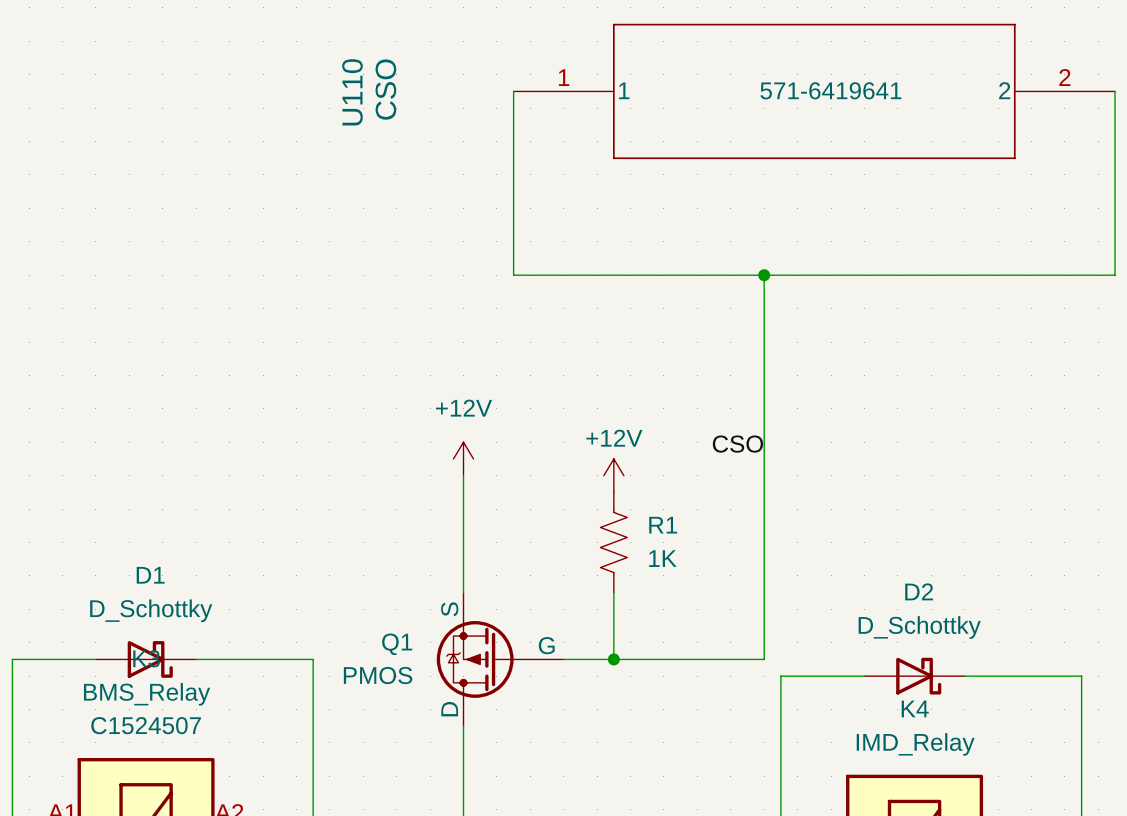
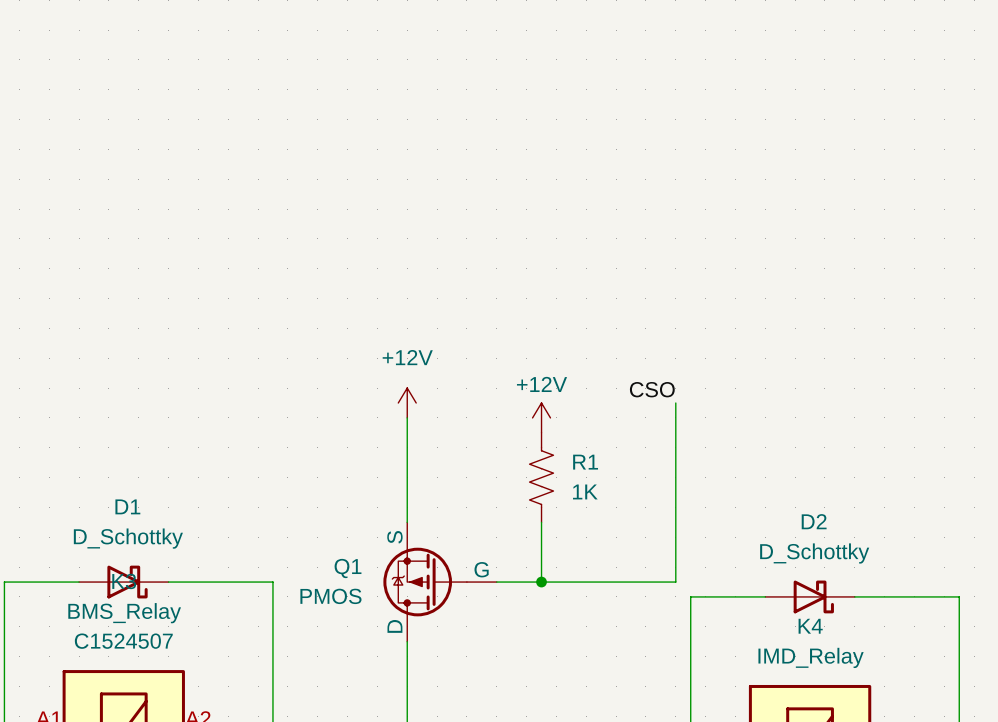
wire: (513, 91) (513, 275) (1115, 275) (1115, 91) -> none
U110: CSO (814, 91) -> none
wire: (764, 275) (764, 458) -> none
junction: (764, 275) -> none

